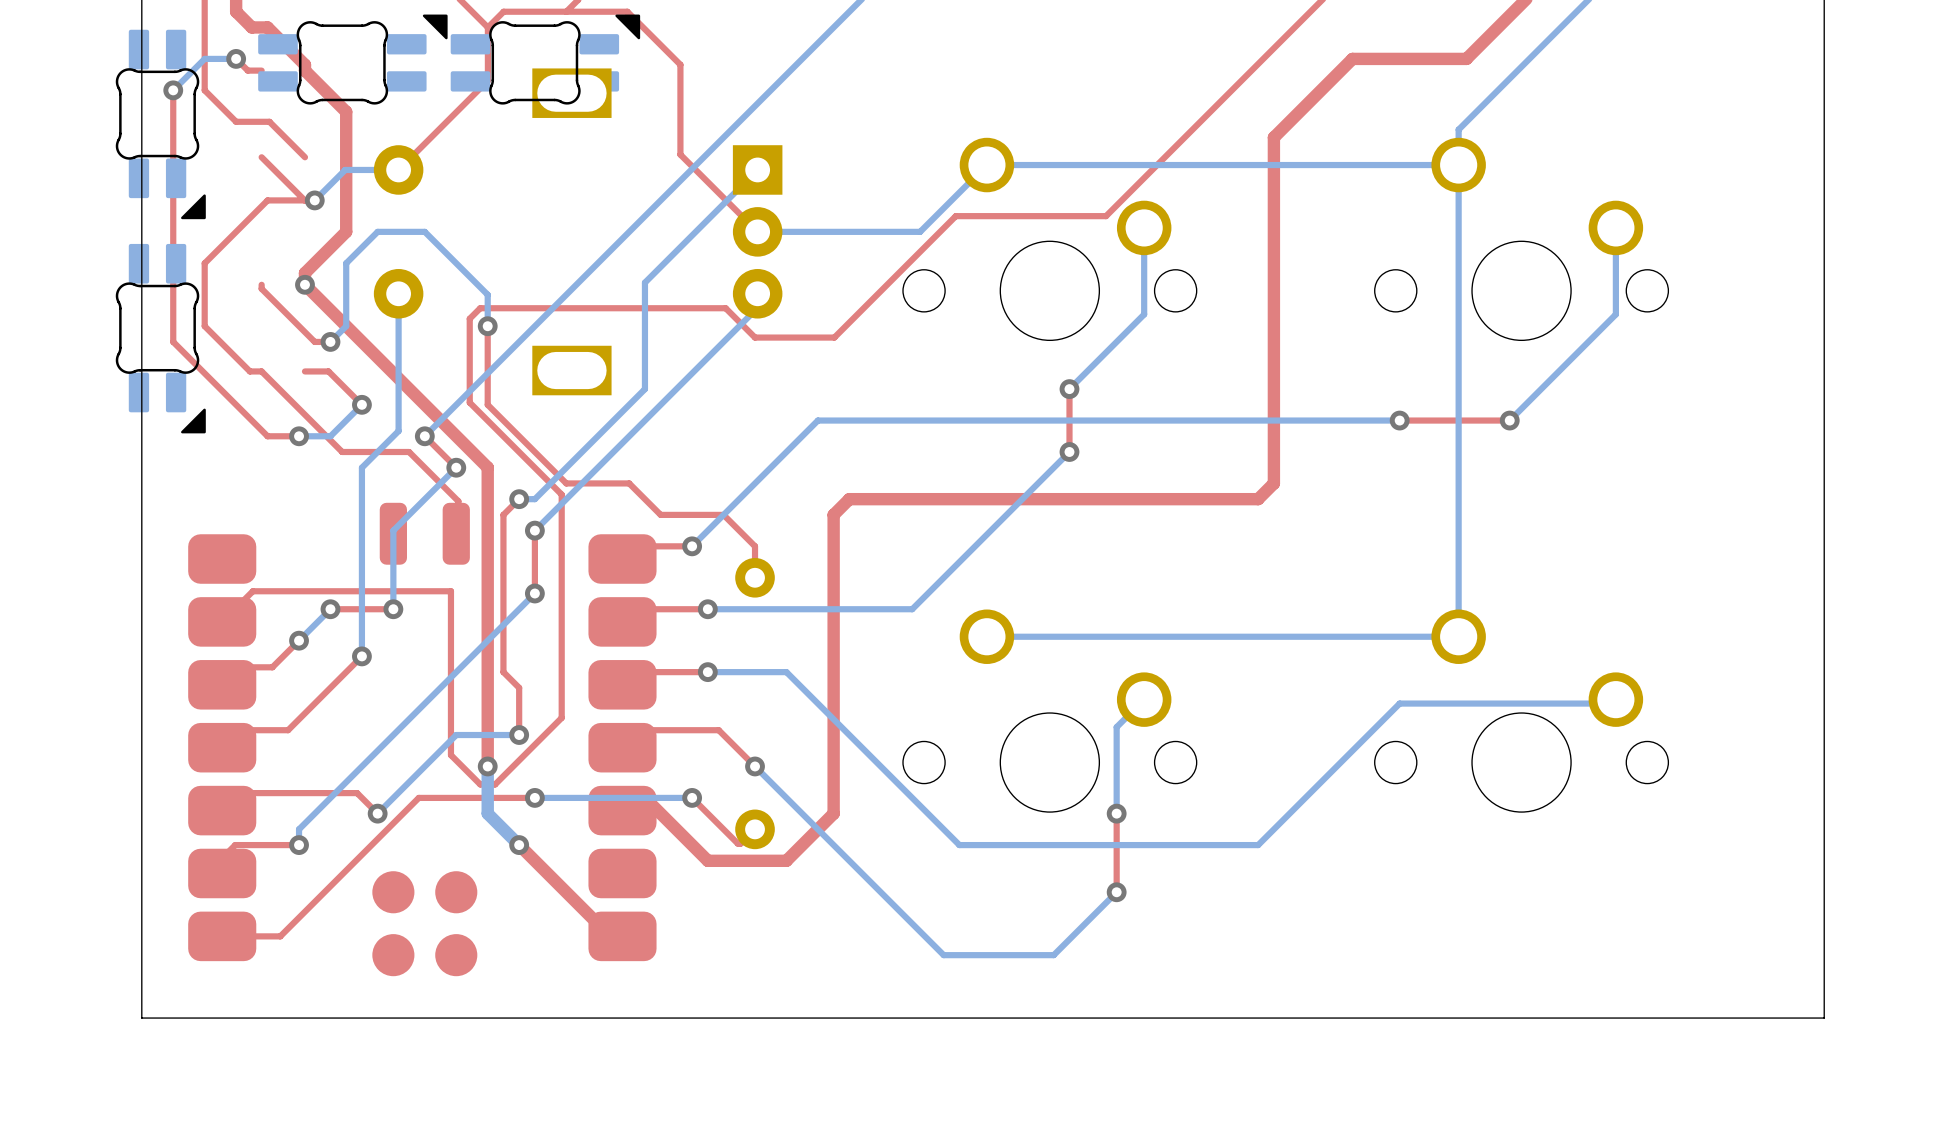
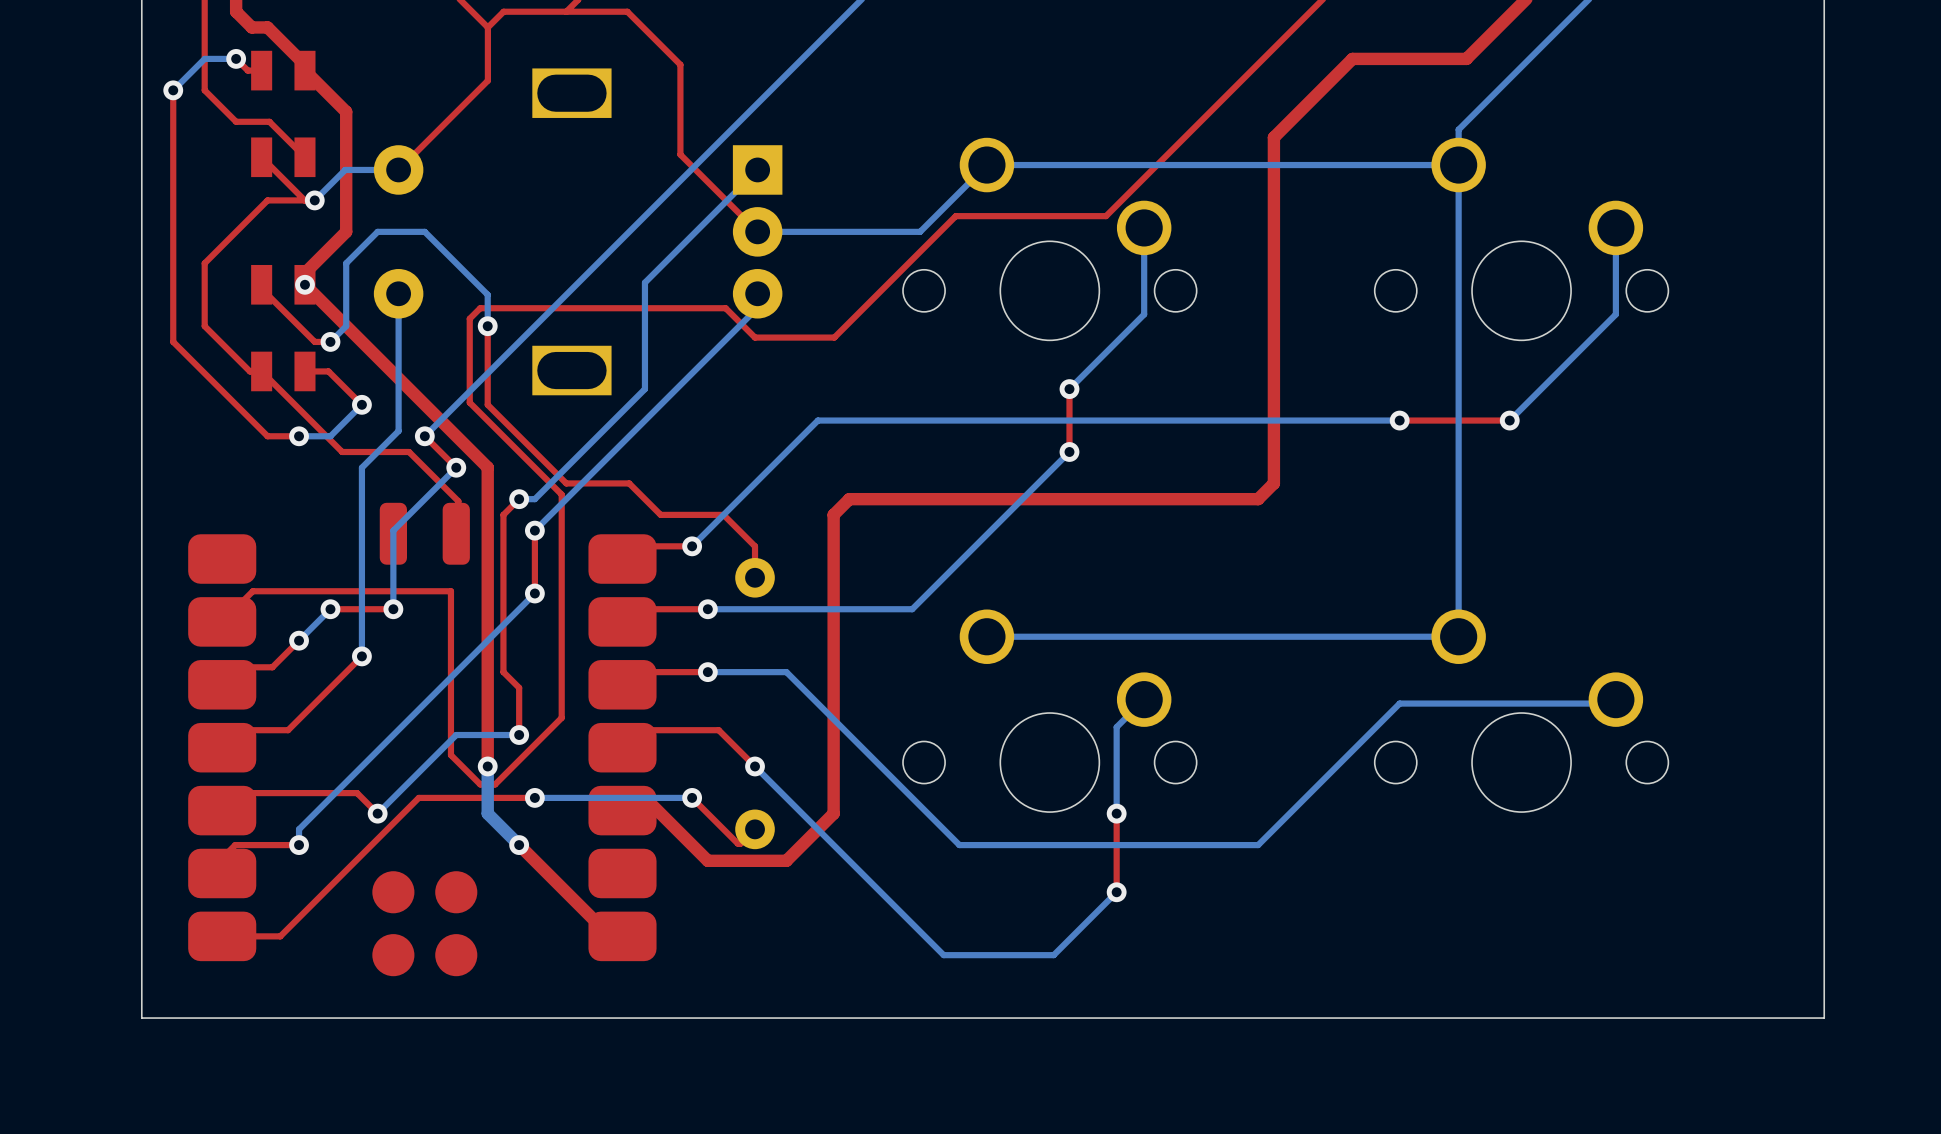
part: (352, 59) -> none
part: (545, 59) -> none
part: none -> (283, 113)
part: (160, 124) -> none
part: none -> (283, 328)
part: (160, 338) -> none

